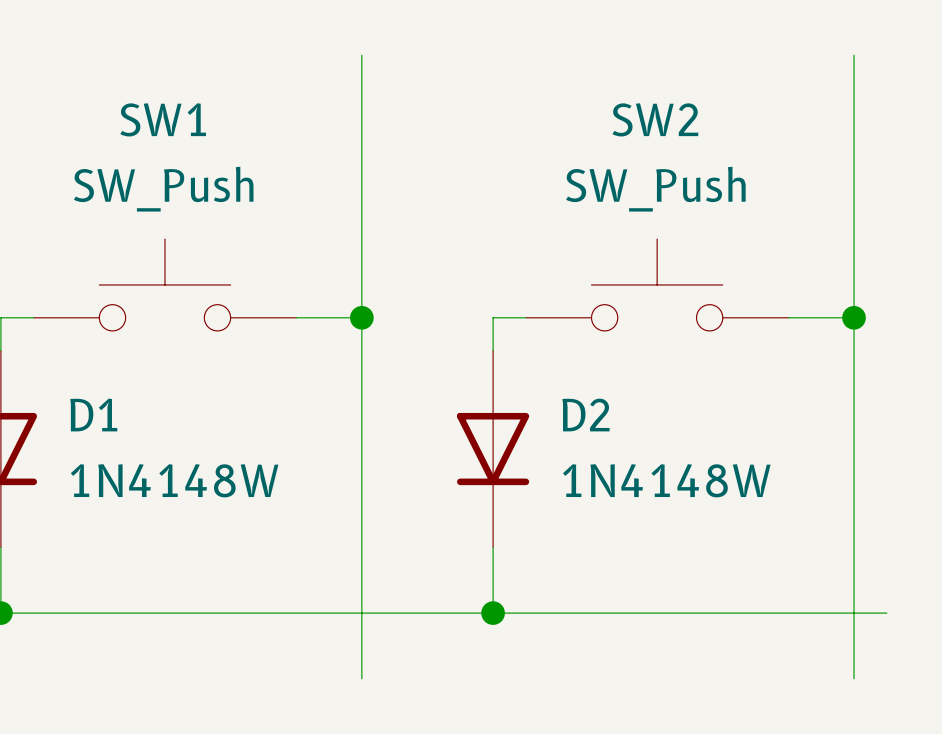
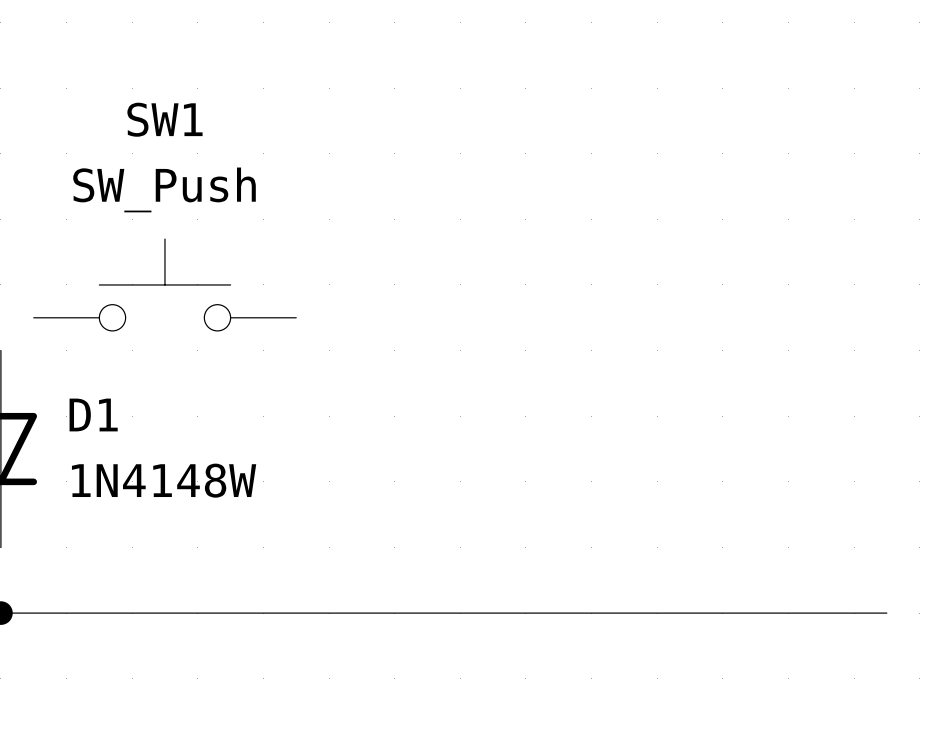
wire: (361, 55) (361, 678) -> none
wire: (854, 55) (854, 678) -> none
SW2: SW_Push (657, 284) -> none
wire: (33, 317) (0, 317) (0, 350) -> none
wire: (296, 317) (361, 317) -> none
junction: (361, 317) -> none
wire: (525, 317) (493, 317) (493, 350) -> none
wire: (788, 317) (854, 317) -> none
junction: (854, 317) -> none
D2: 1N4148W (493, 449) -> none
wire: (0, 547) (0, 613) -> none
wire: (493, 547) (493, 613) -> none
junction: (493, 613) -> none

